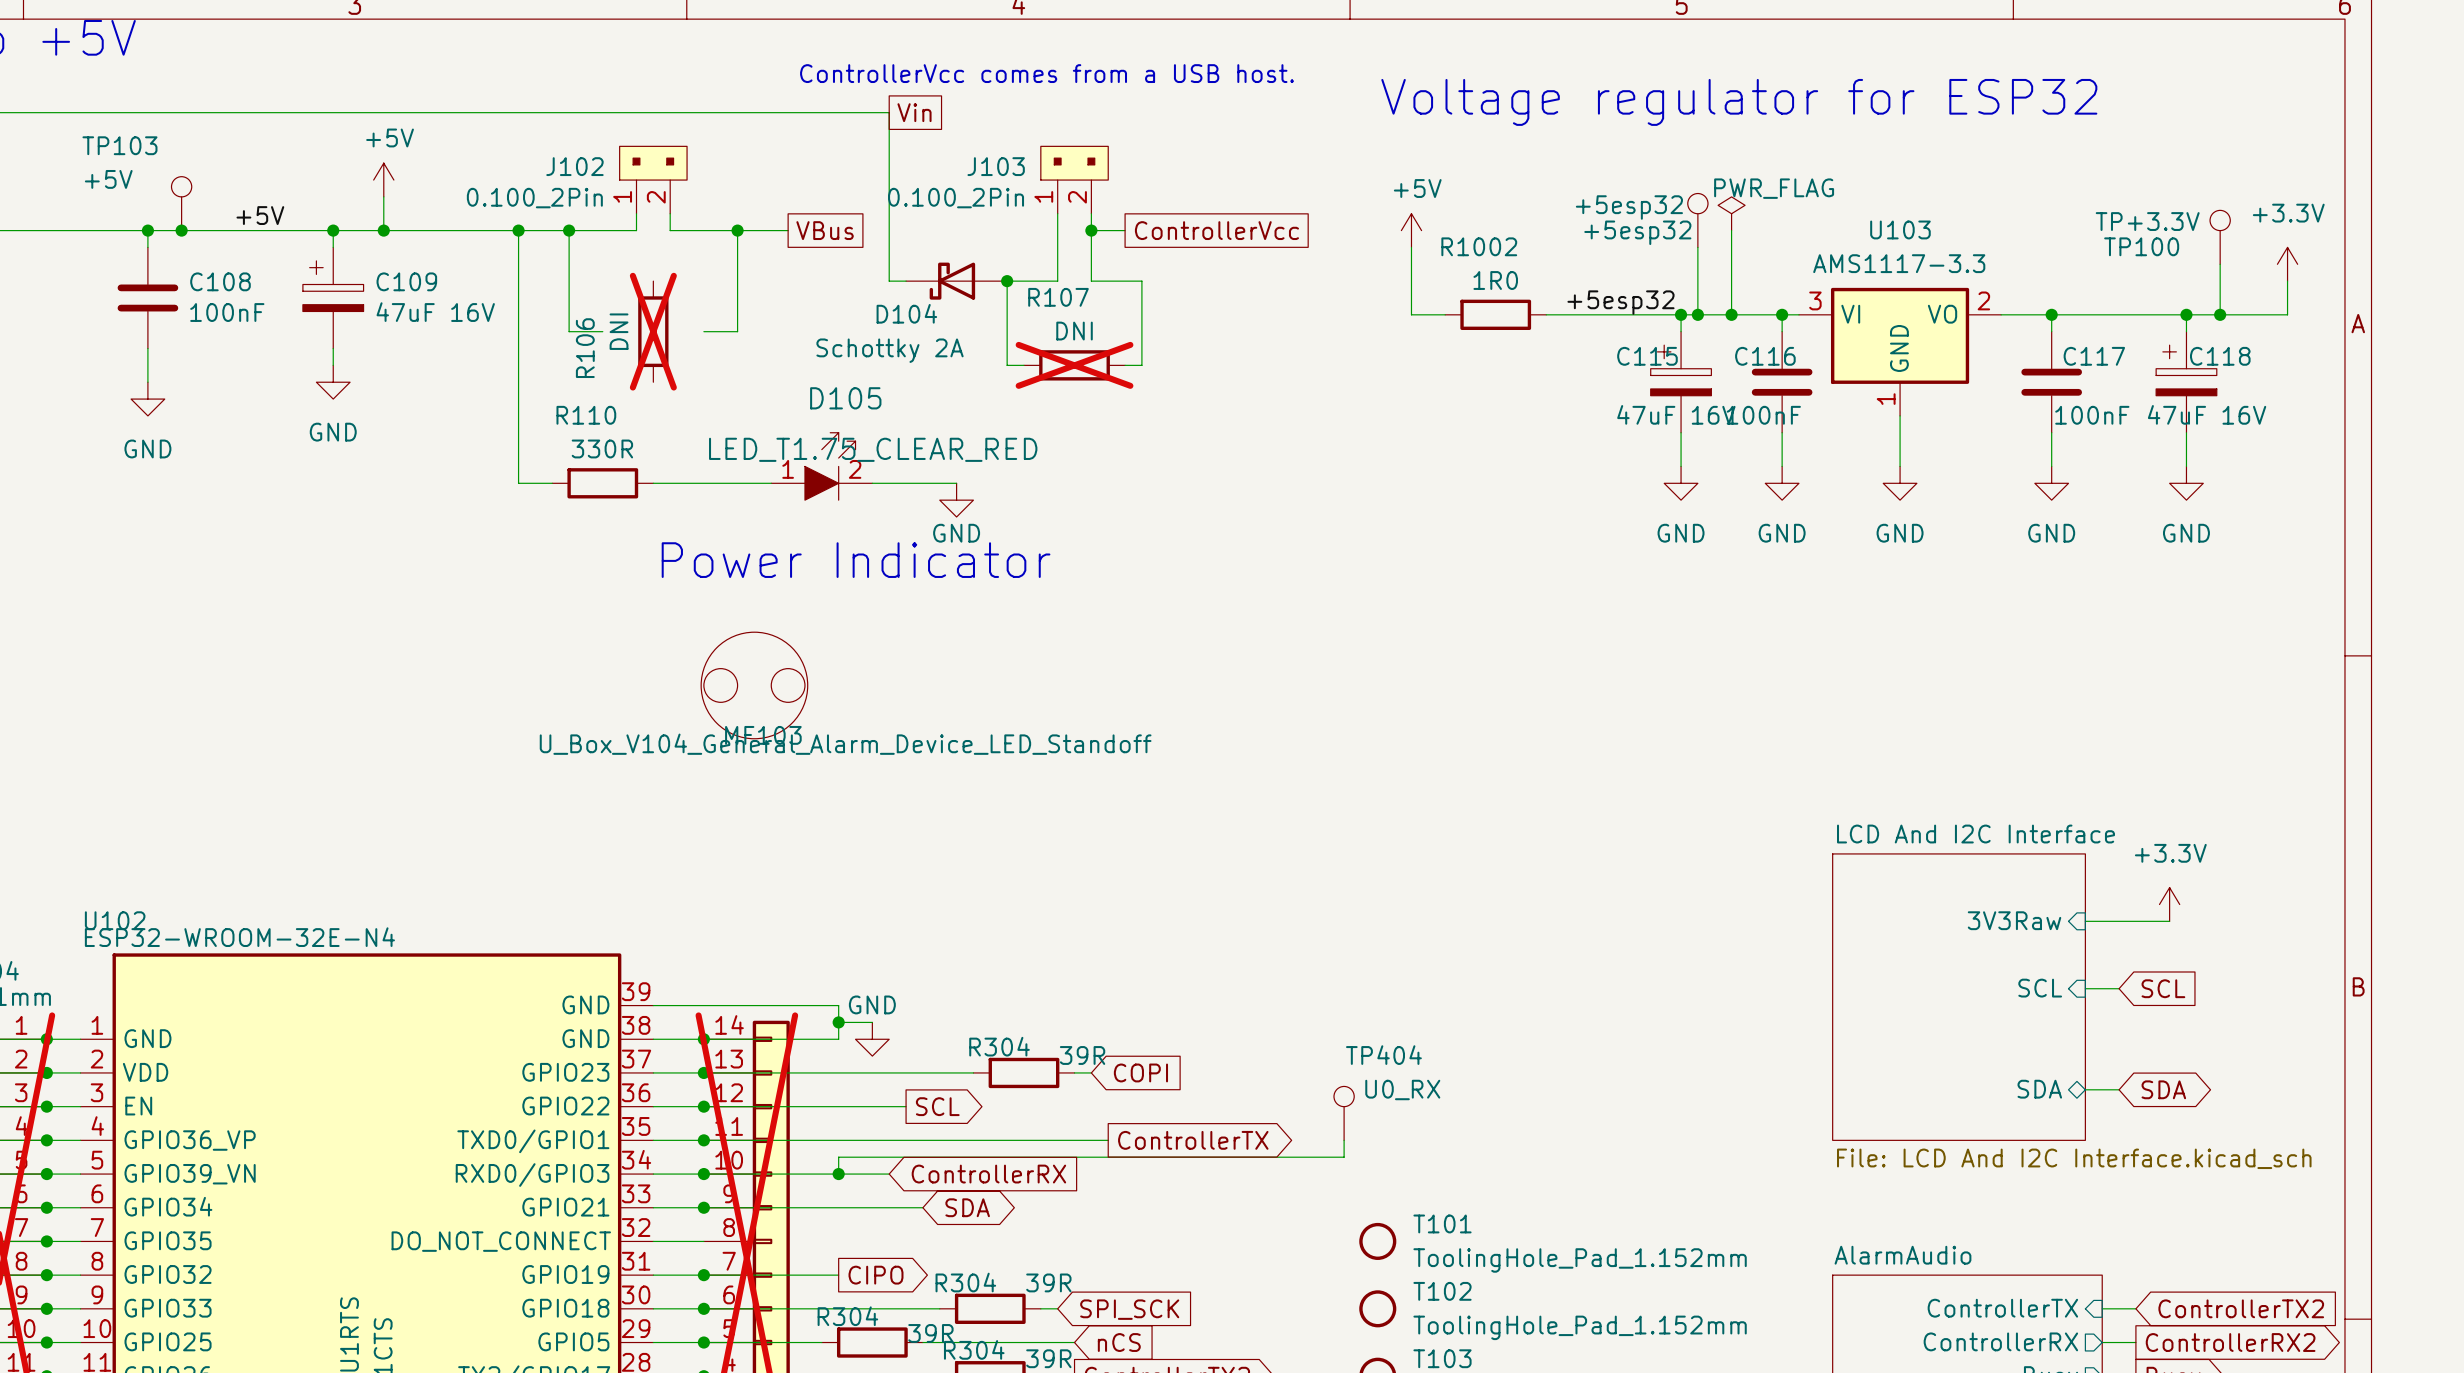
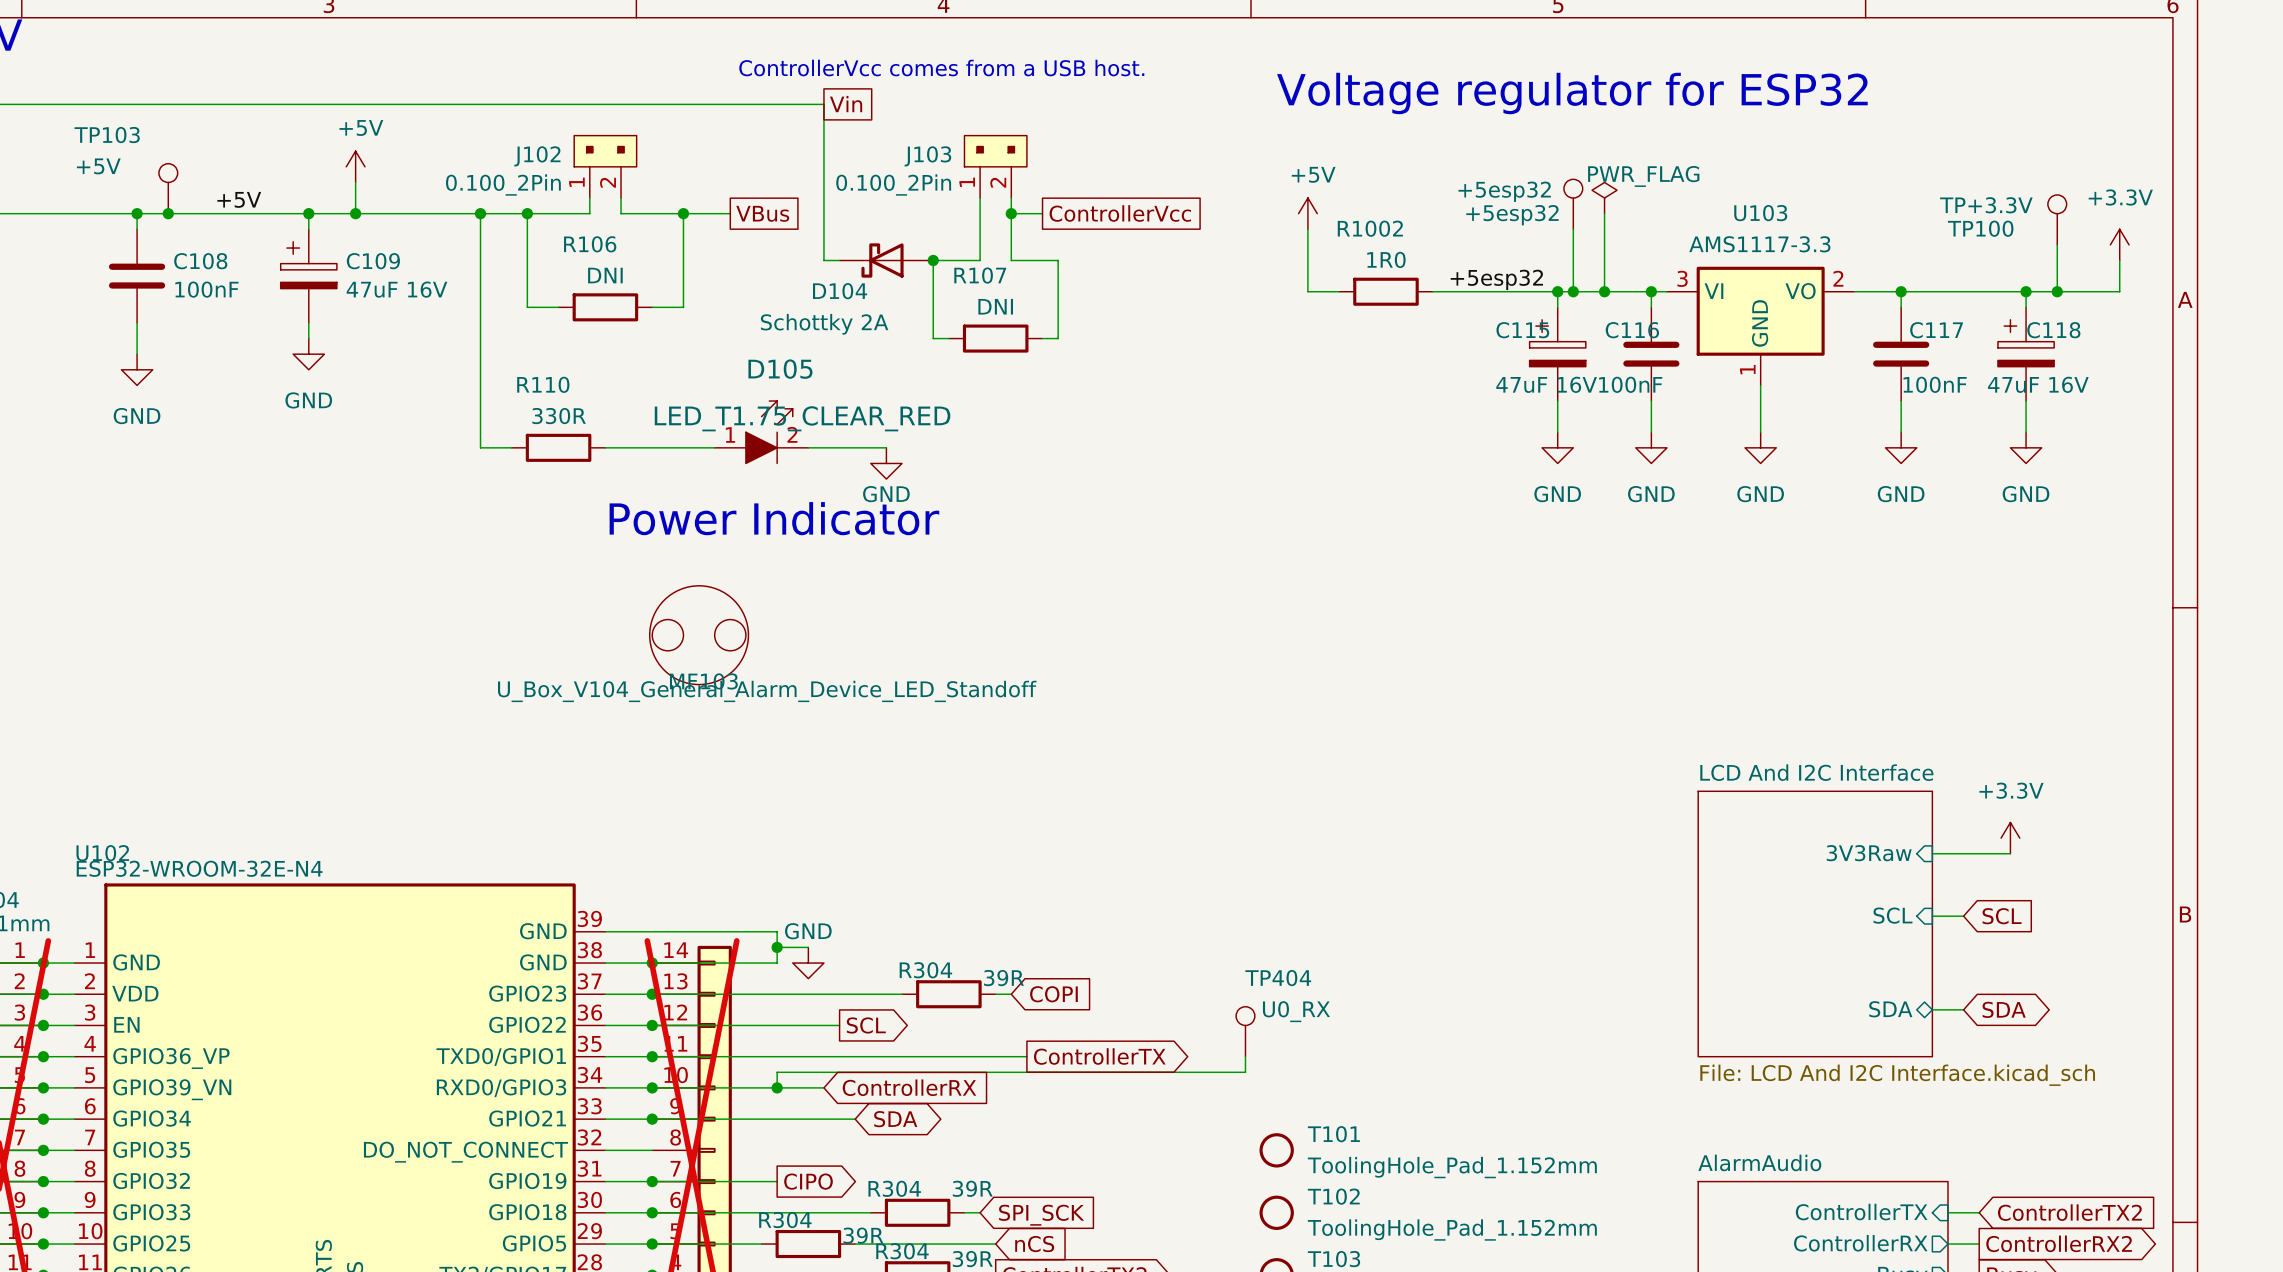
R106 rotation: 0° (653, 331) -> 90° clockwise (605, 307)
R106 do-not-place cross: (653, 331) -> none
R107 do-not-place cross: (1074, 365) -> none

